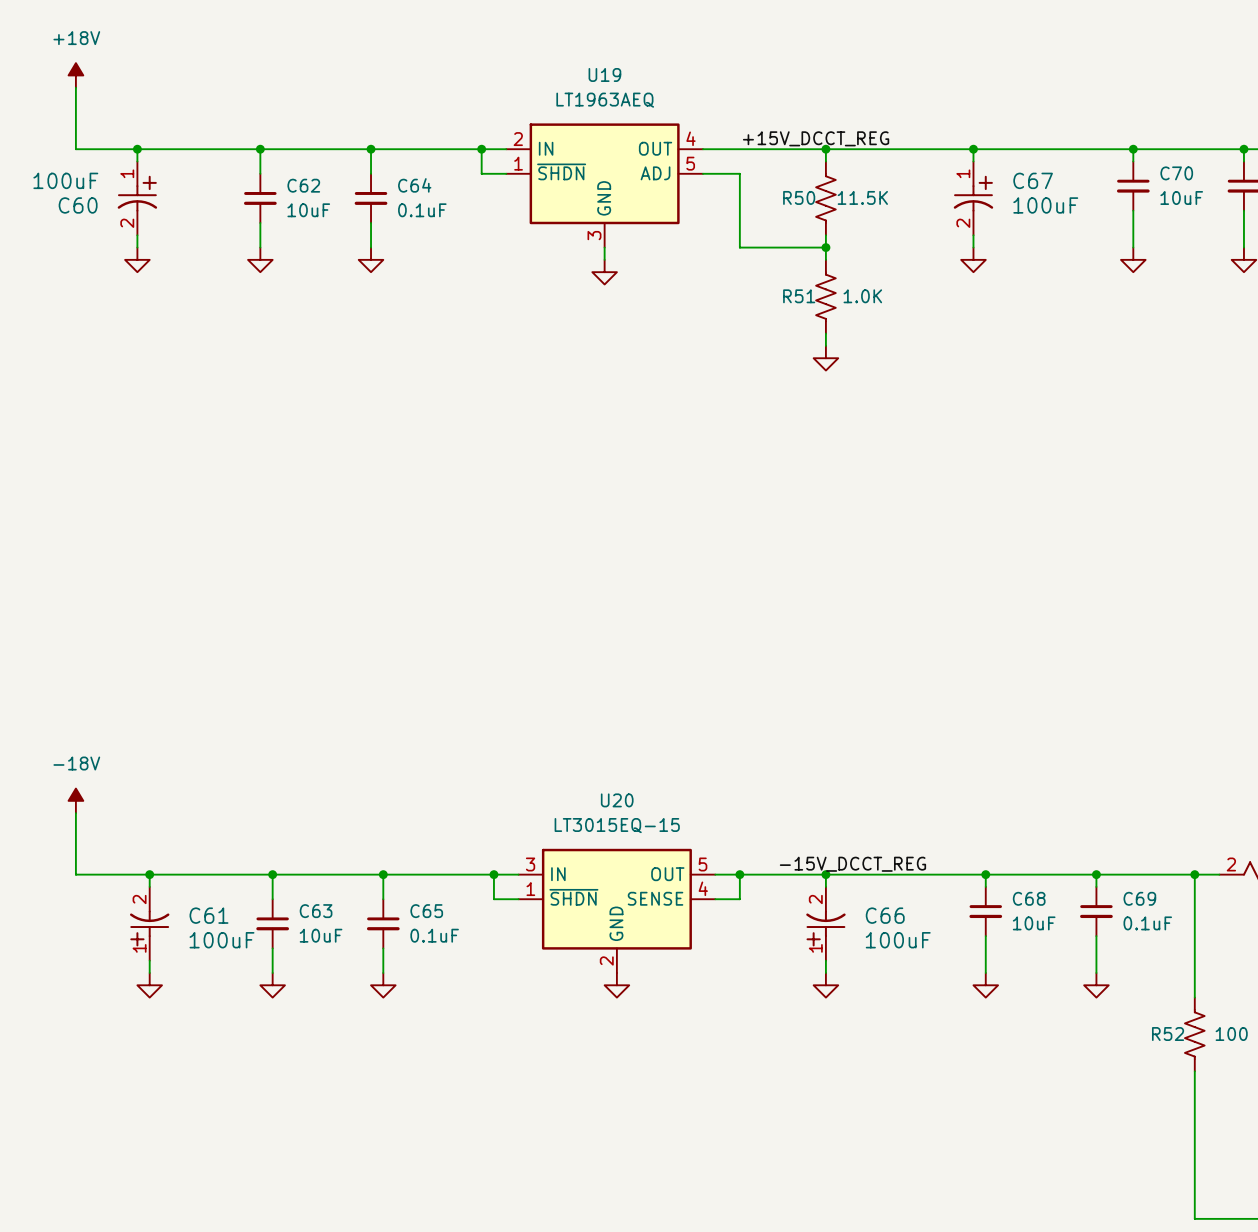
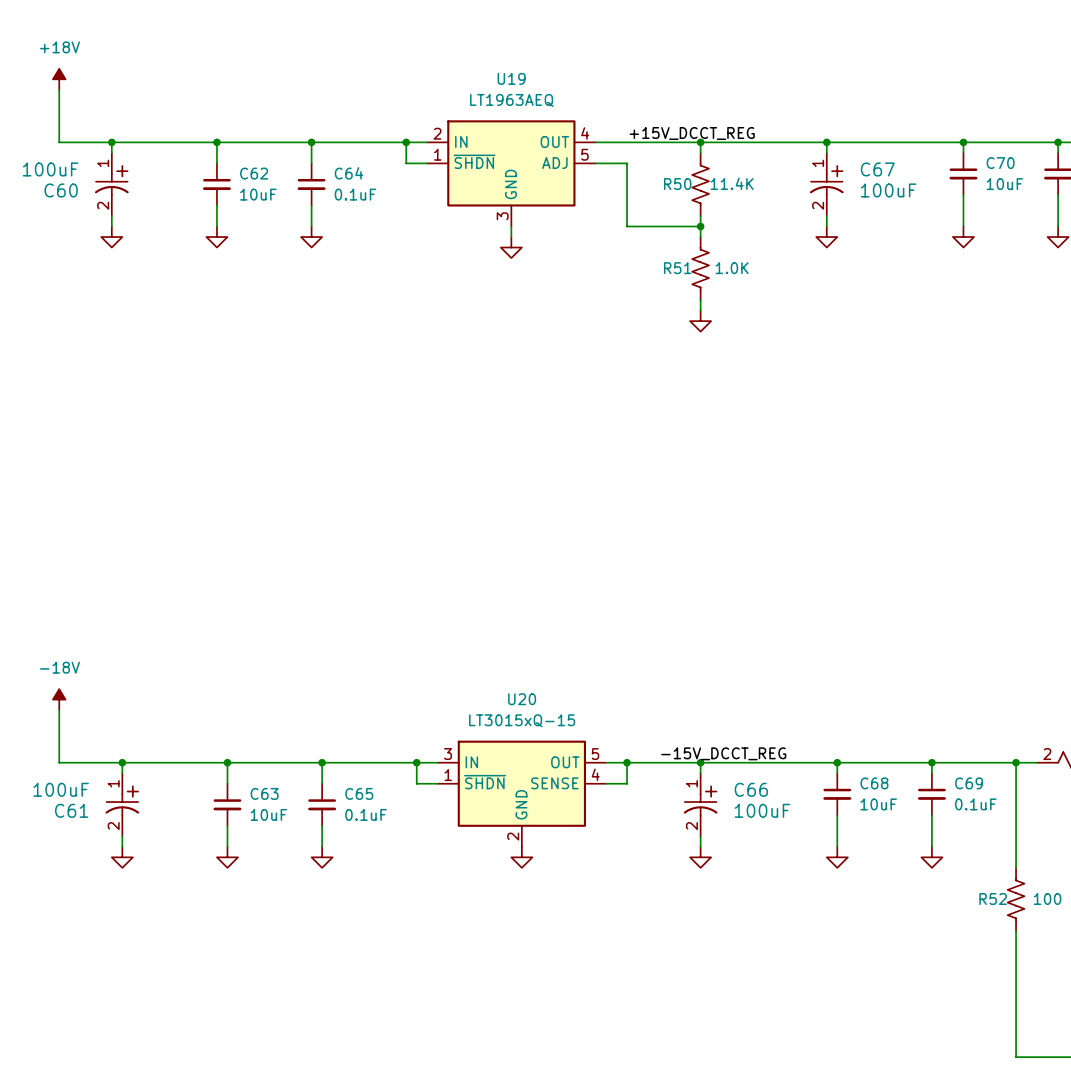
R50 value: 11.5K (862, 197) -> 11.4K (732, 183)
U20 value: LT3015EQ-15 (617, 825) -> LT3015xQ-15 (522, 720)
C61 rotation: 0° (149, 928) -> 180° (122, 800)
C66 rotation: 0° (825, 928) -> 180° (700, 800)

